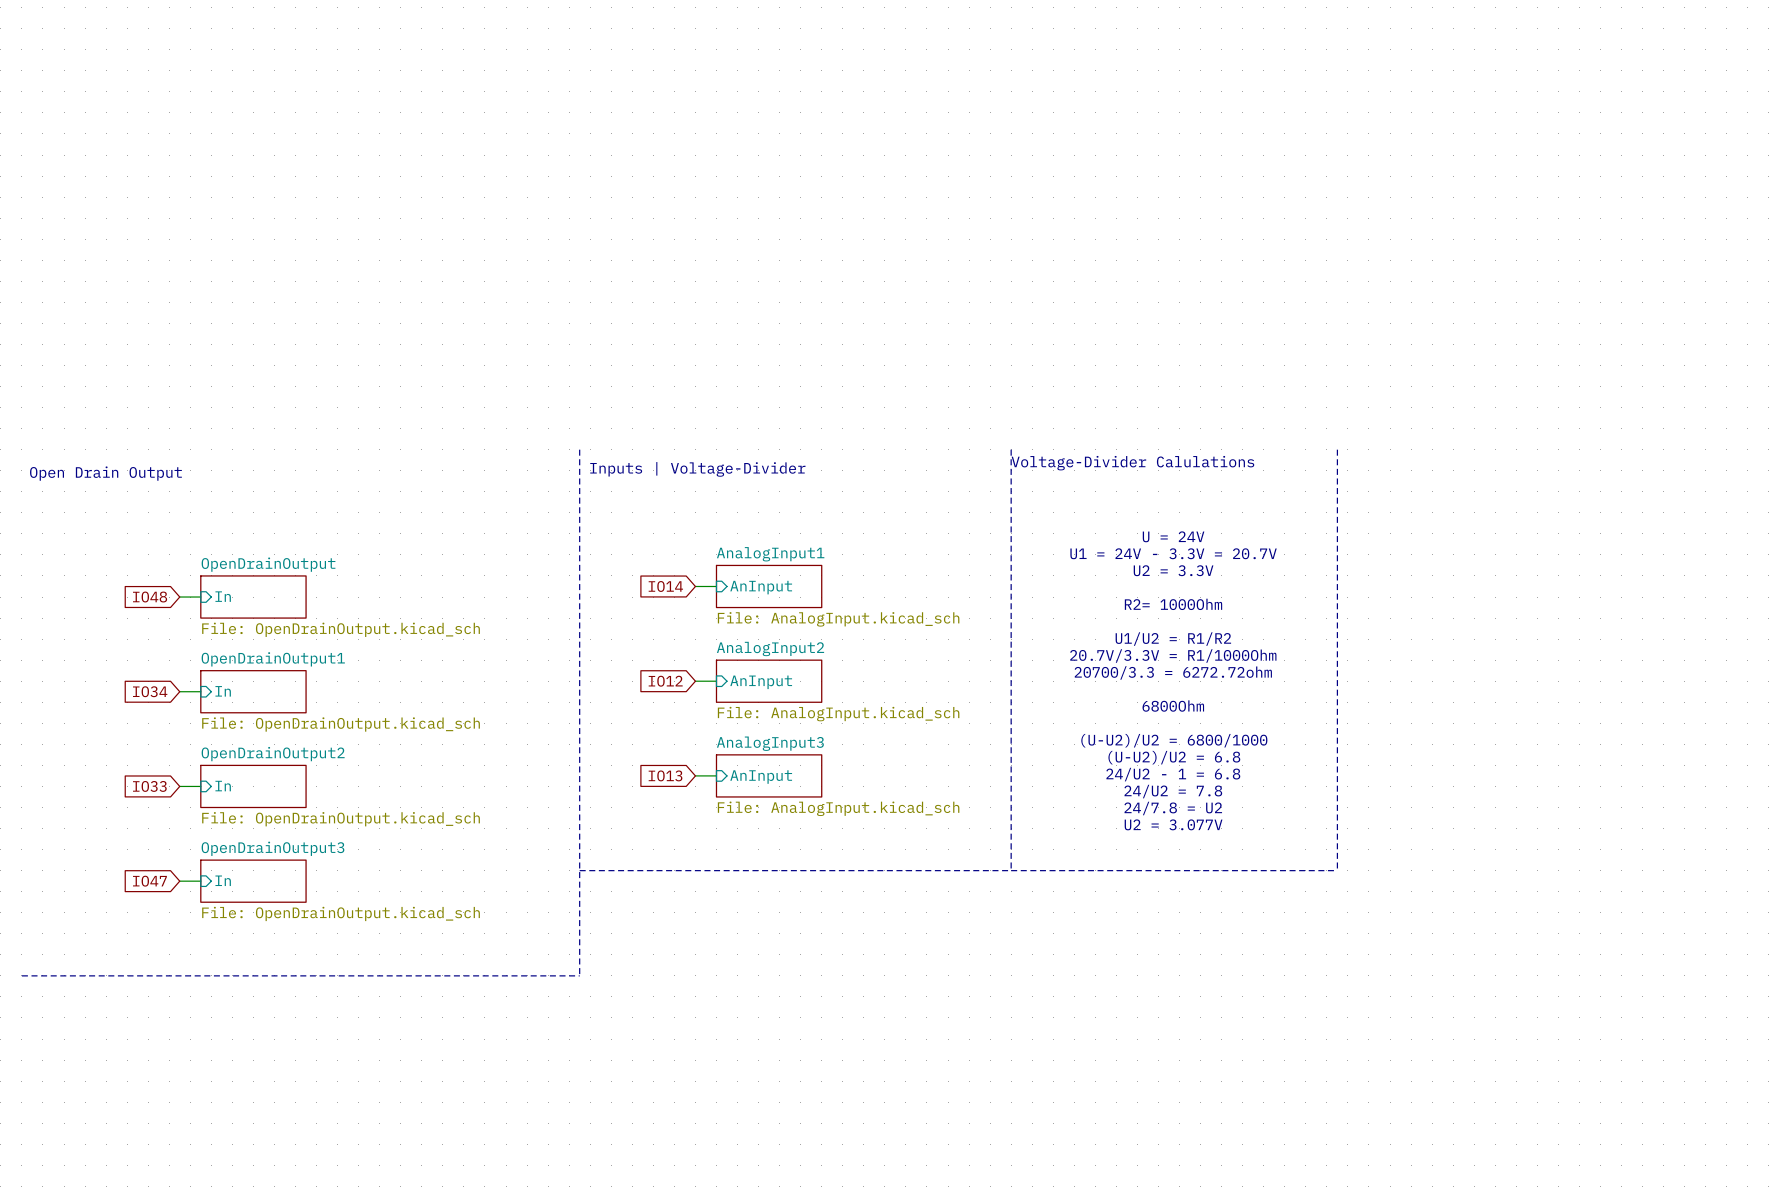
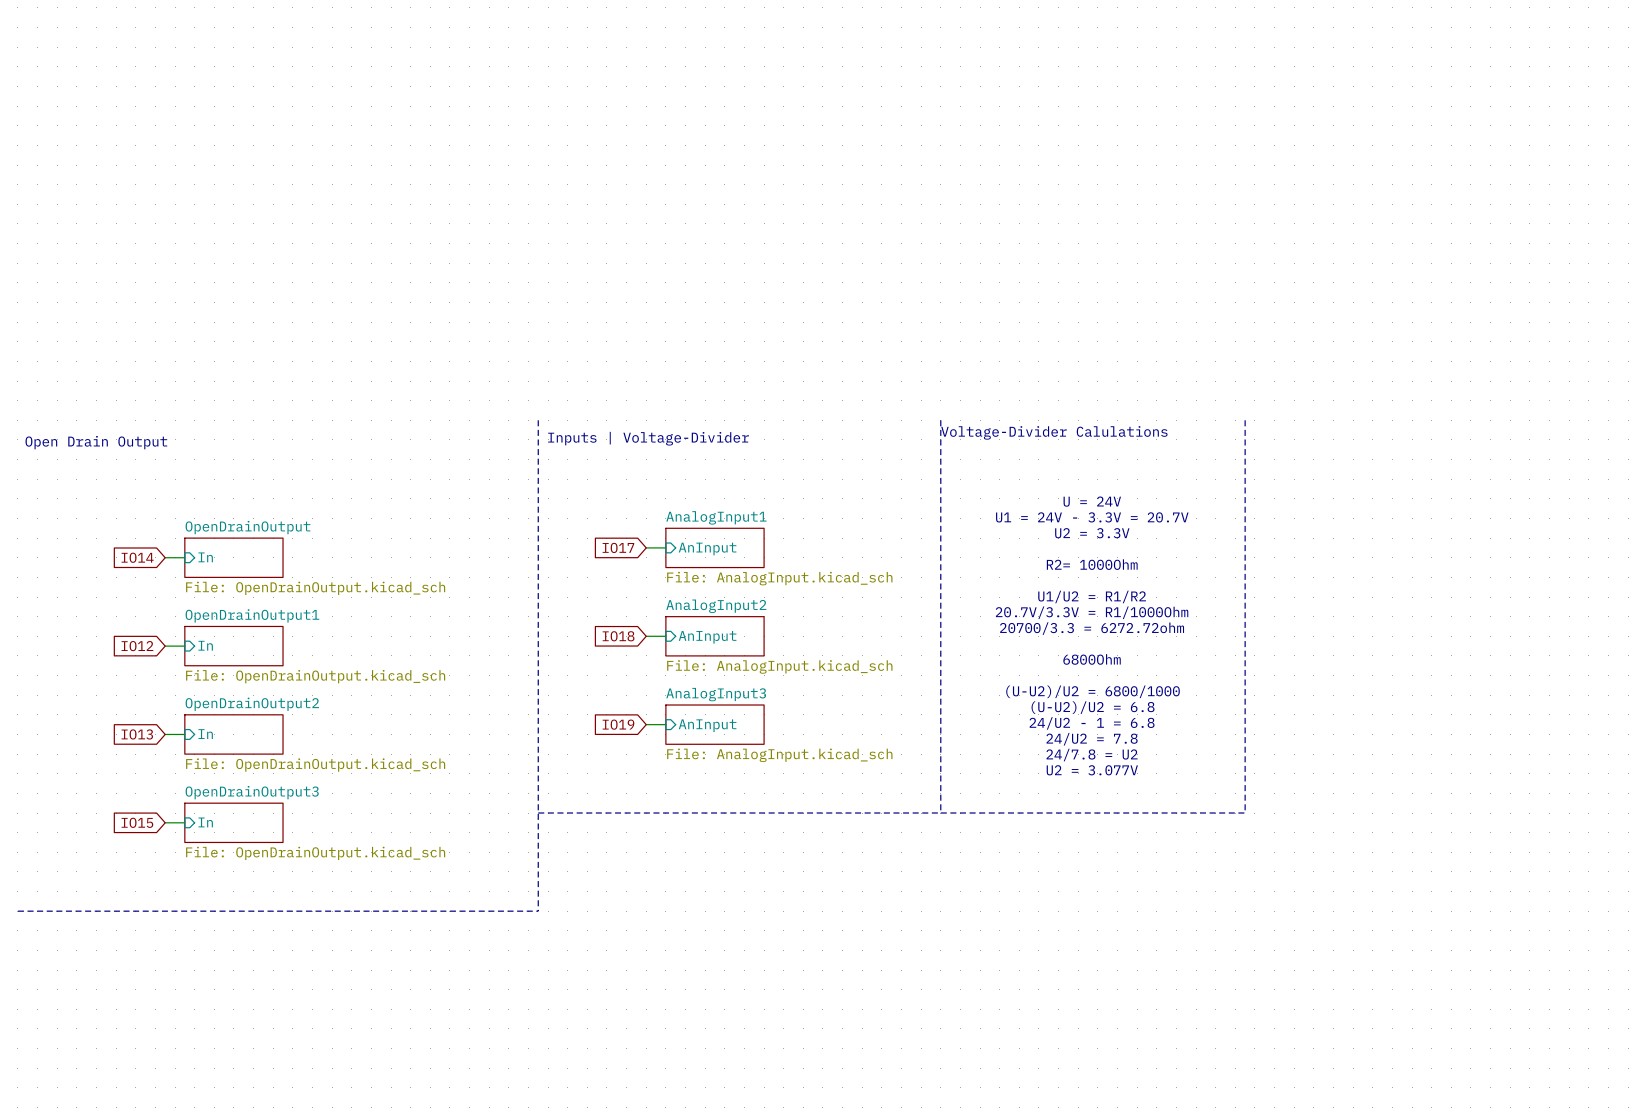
global label: IO14 (665, 586) -> IO17 (618, 547)
global label: IO48 (150, 597) -> IO14 (137, 557)
global label: IO12 (665, 681) -> IO18 (618, 636)
global label: IO34 (150, 691) -> IO12 (137, 646)
global label: IO13 (665, 775) -> IO19 (618, 724)
global label: IO33 (149, 786) -> IO13 (137, 734)
global label: IO47 (149, 881) -> IO15 (137, 822)

